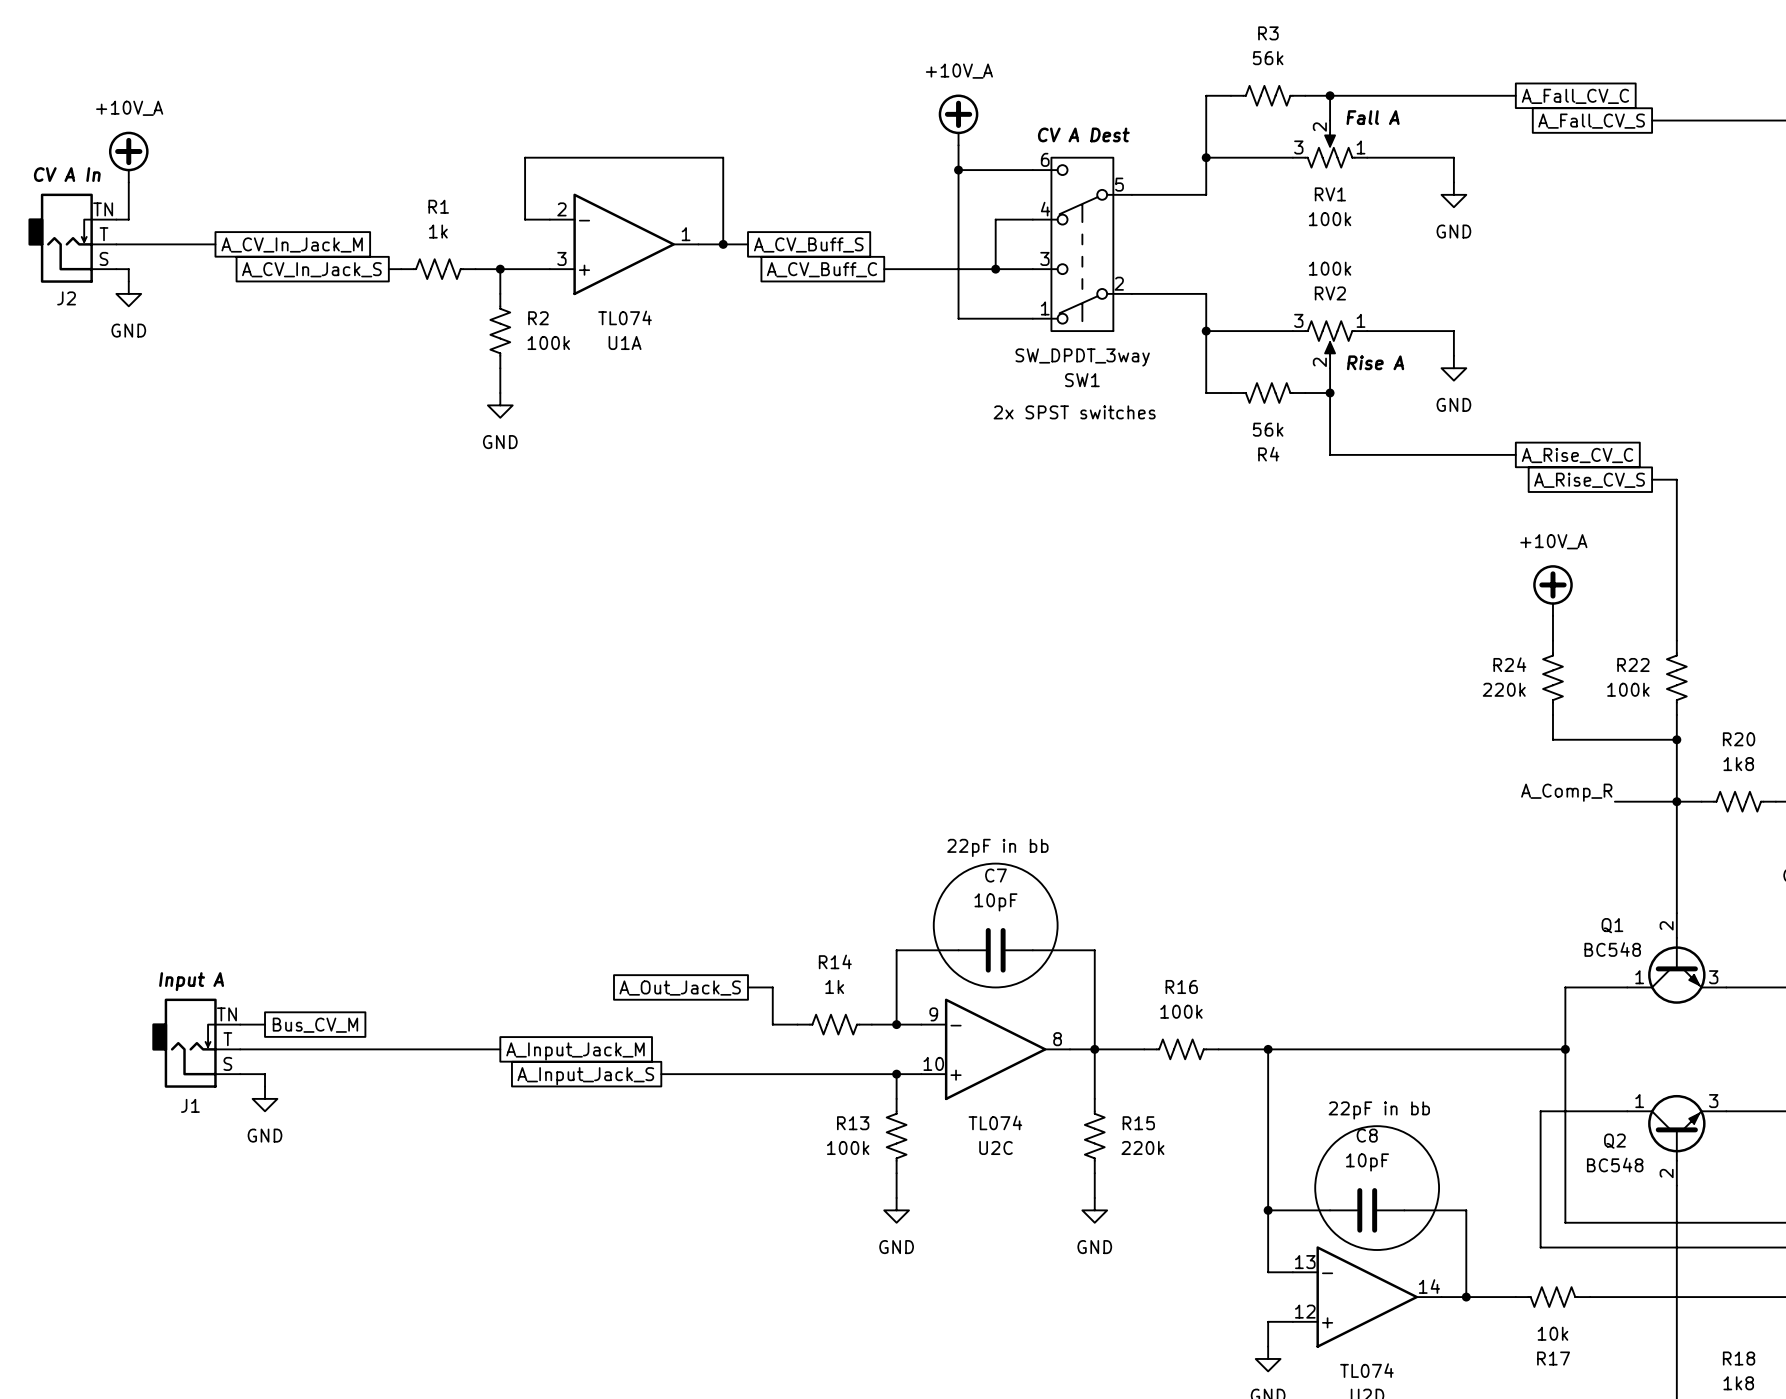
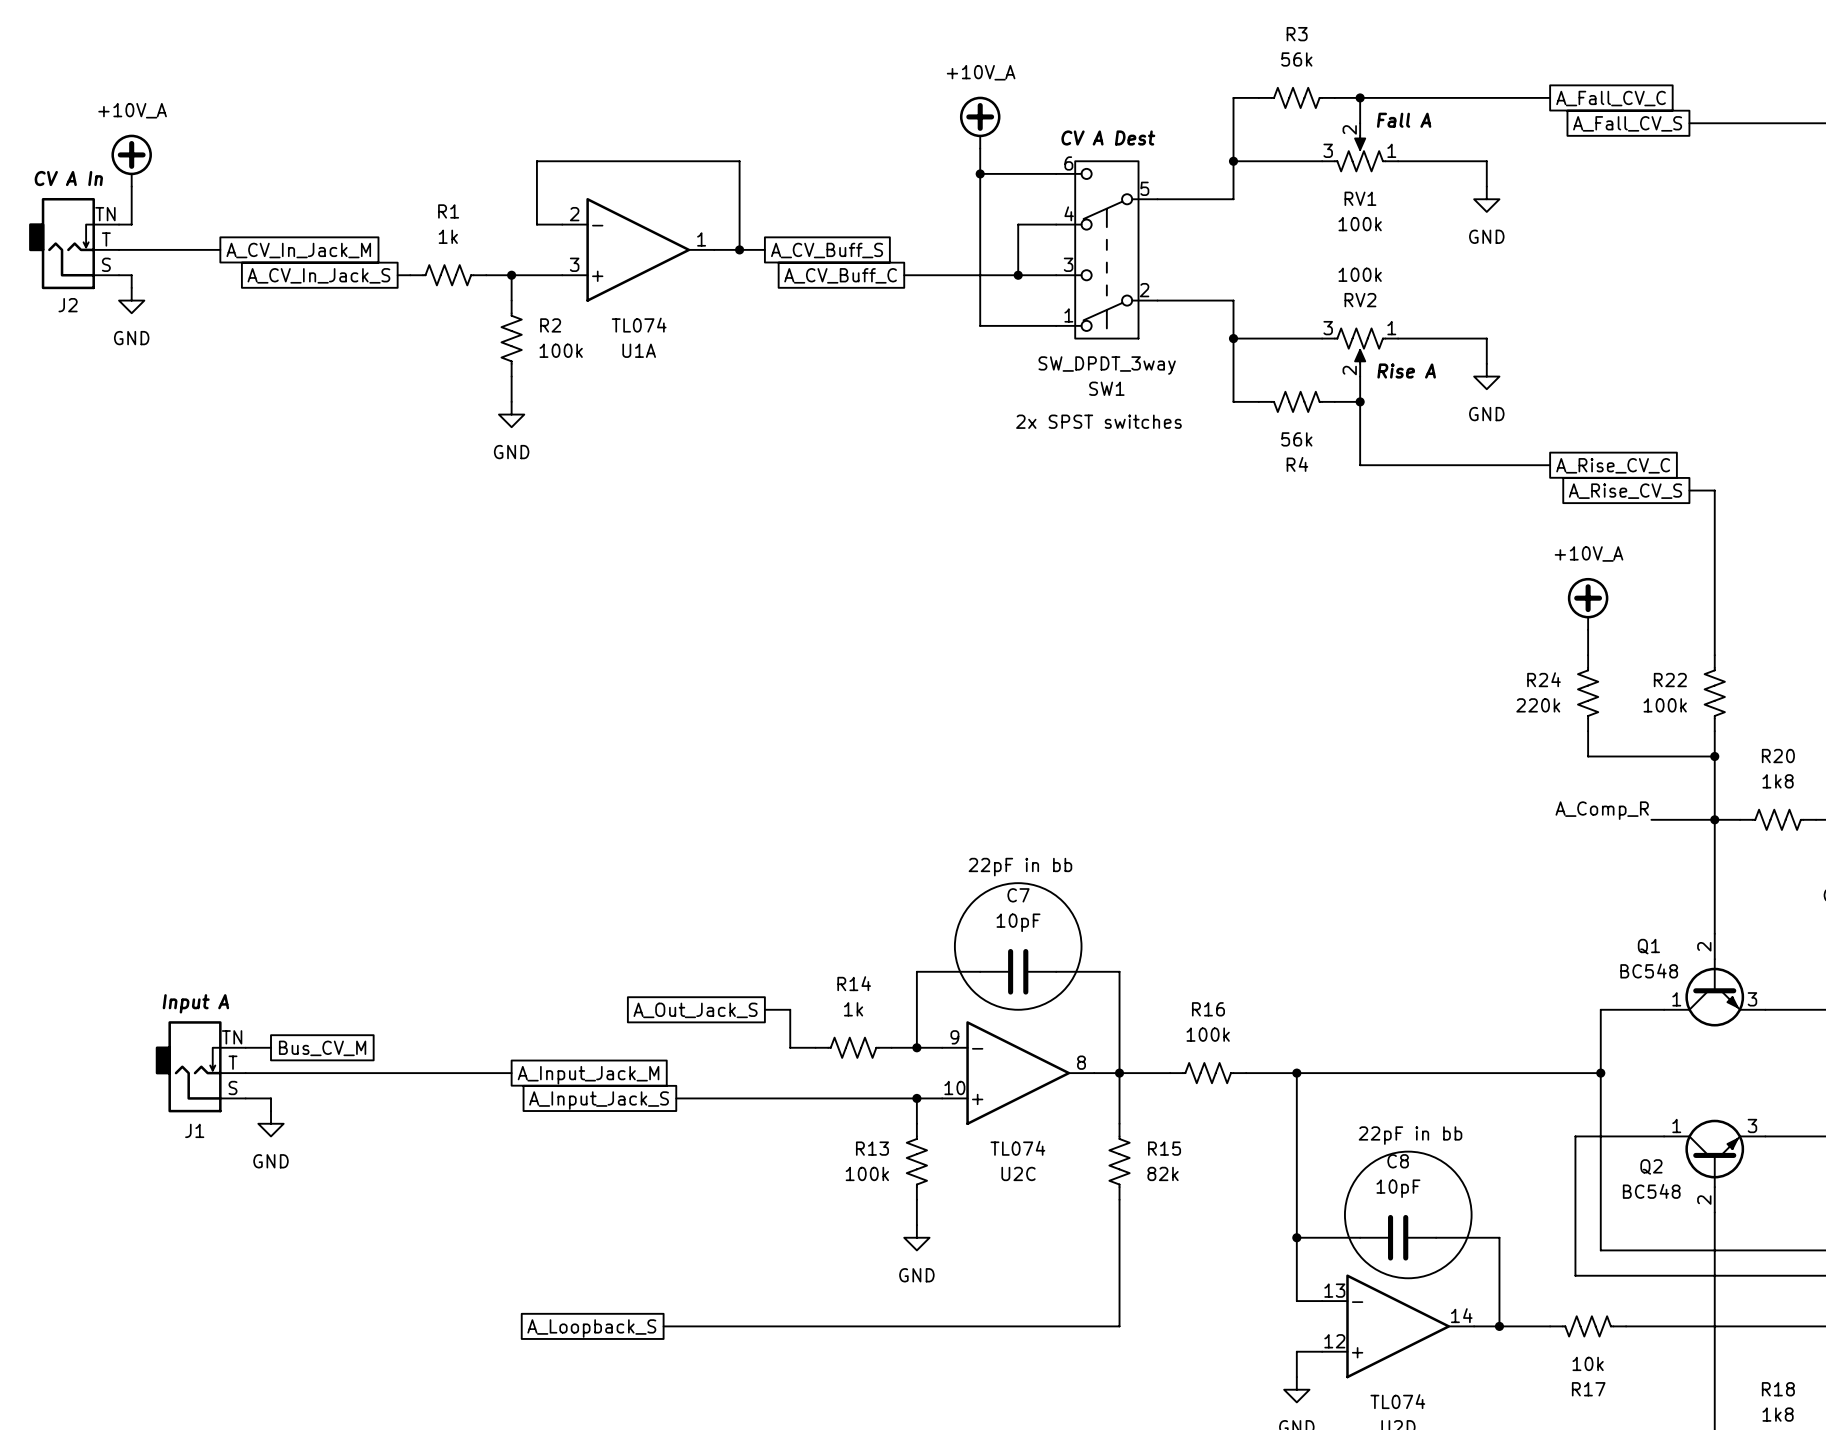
R15 value: 220k (1142, 1147) -> 82k (1163, 1173)
wire: none -> (1119, 1225) (1119, 1326) (663, 1326)
power symbol: GND (1094, 1210) -> none
global label: none -> A_Loopback_S (591, 1328)

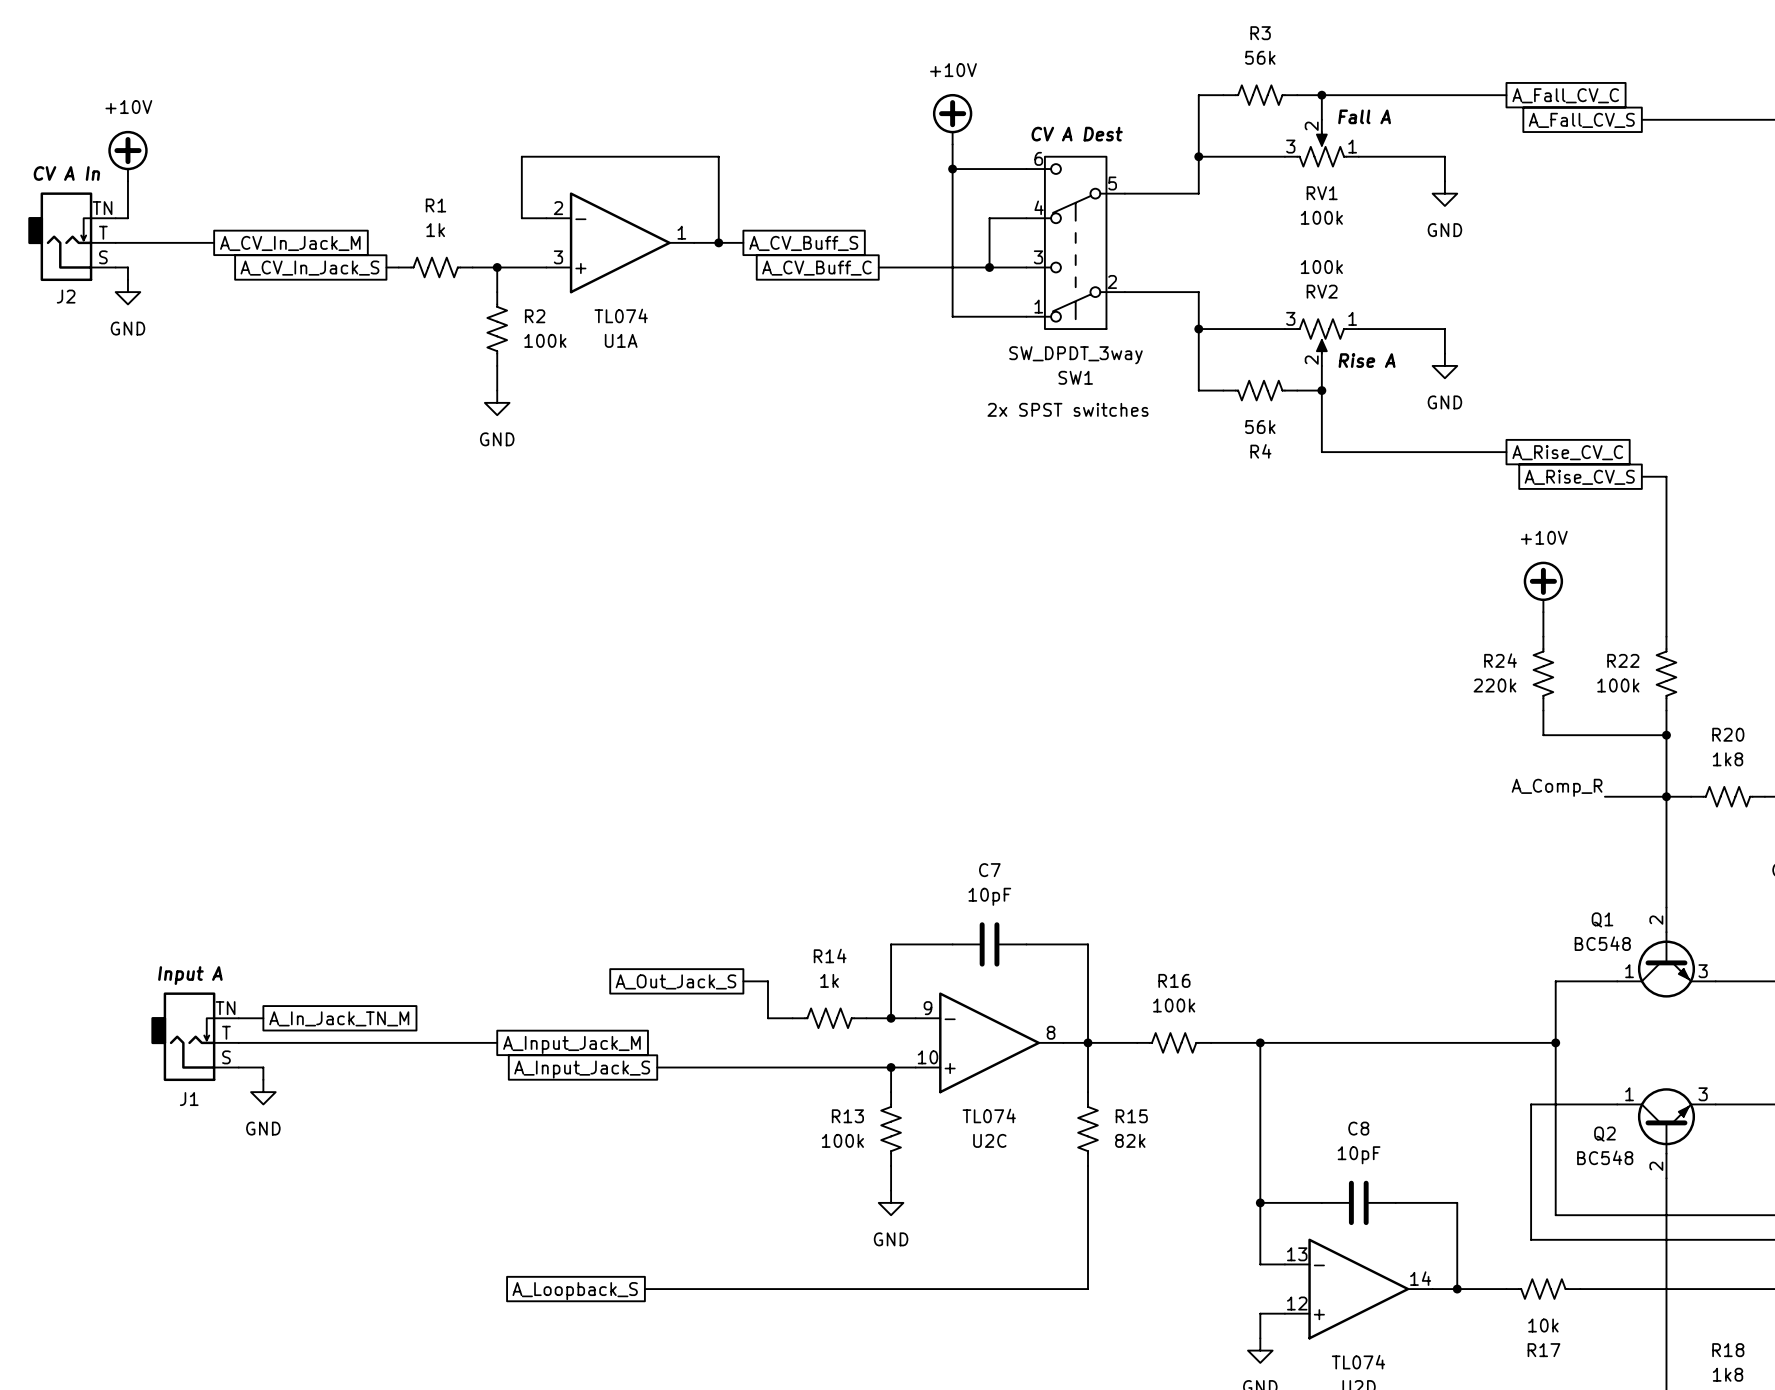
power symbol: +10V_A (980, 122) -> +10V (952, 119)
power symbol: +10V_A (131, 160) -> +10V (127, 156)
power symbol: +10V_A (1588, 603) -> +10V (1543, 586)
text: 22pF in bb (1020, 867) -> none
drawing: [954, 883, 1082, 1010] -> none
global label: Bus_CV_M (322, 1048) -> A_In_Jack_TN_M (339, 1018)
text: 22pF in bb (1410, 1135) -> none
drawing: [1344, 1151, 1472, 1279] -> none

